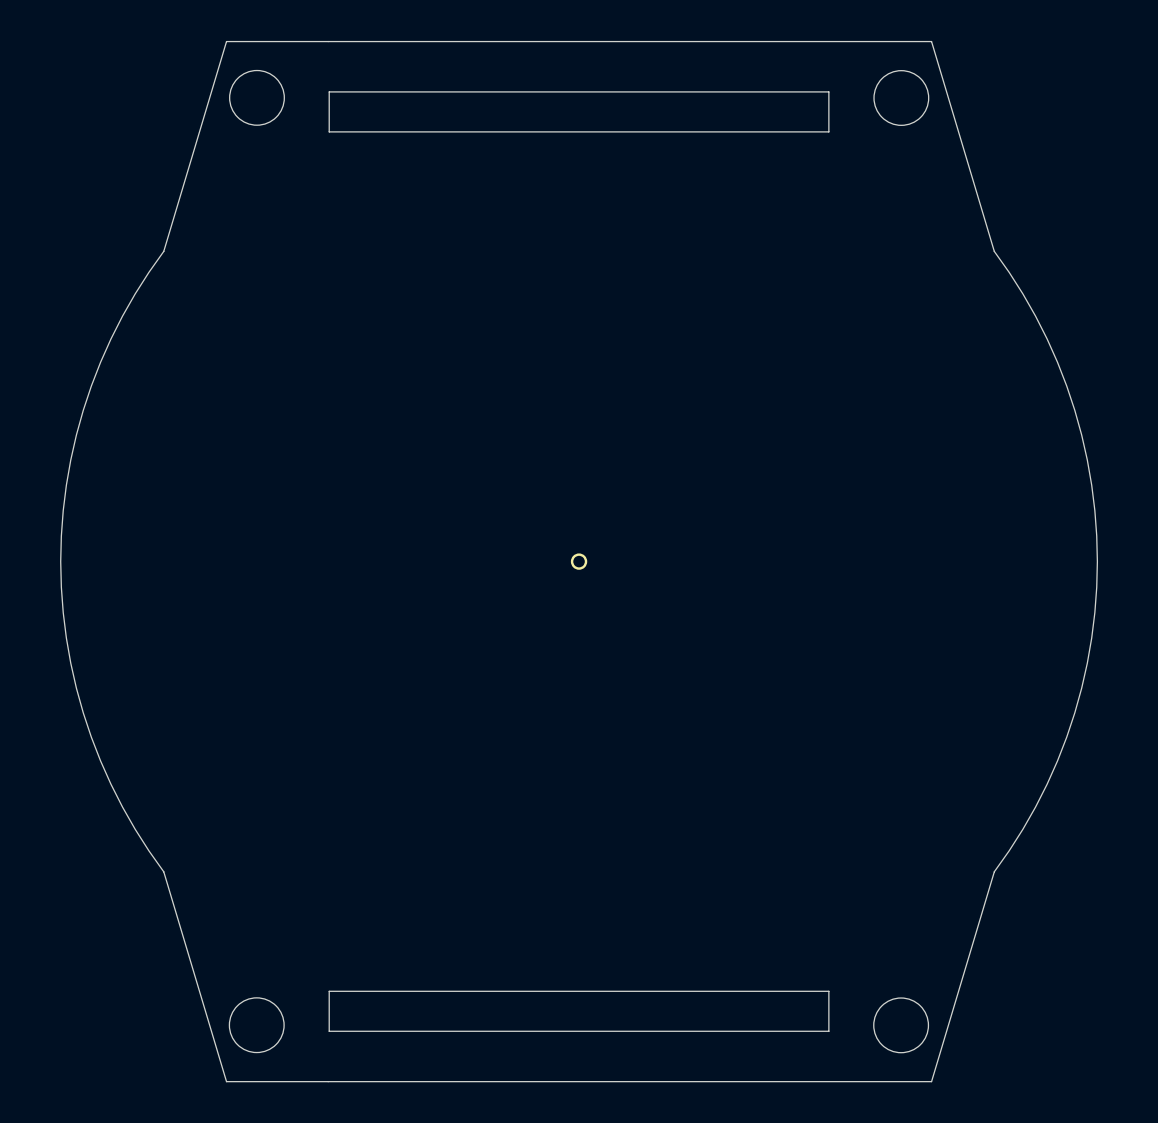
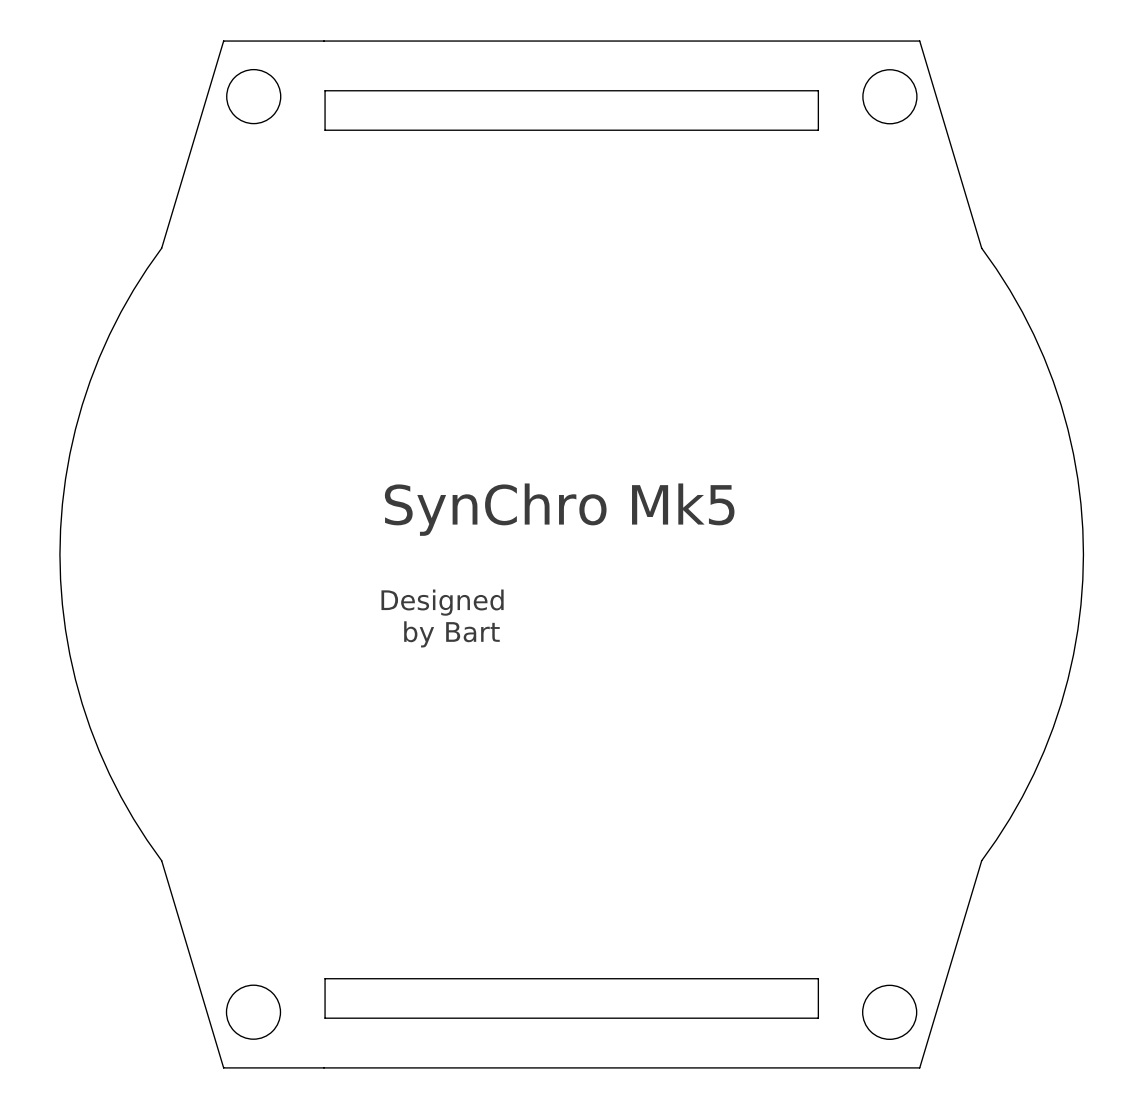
text: none -> SynChro Mk5 (559, 509)
drawing: [570, 553, 588, 570] -> none
text: none -> Designed (442, 602)
text: none -> by Bart (451, 634)

